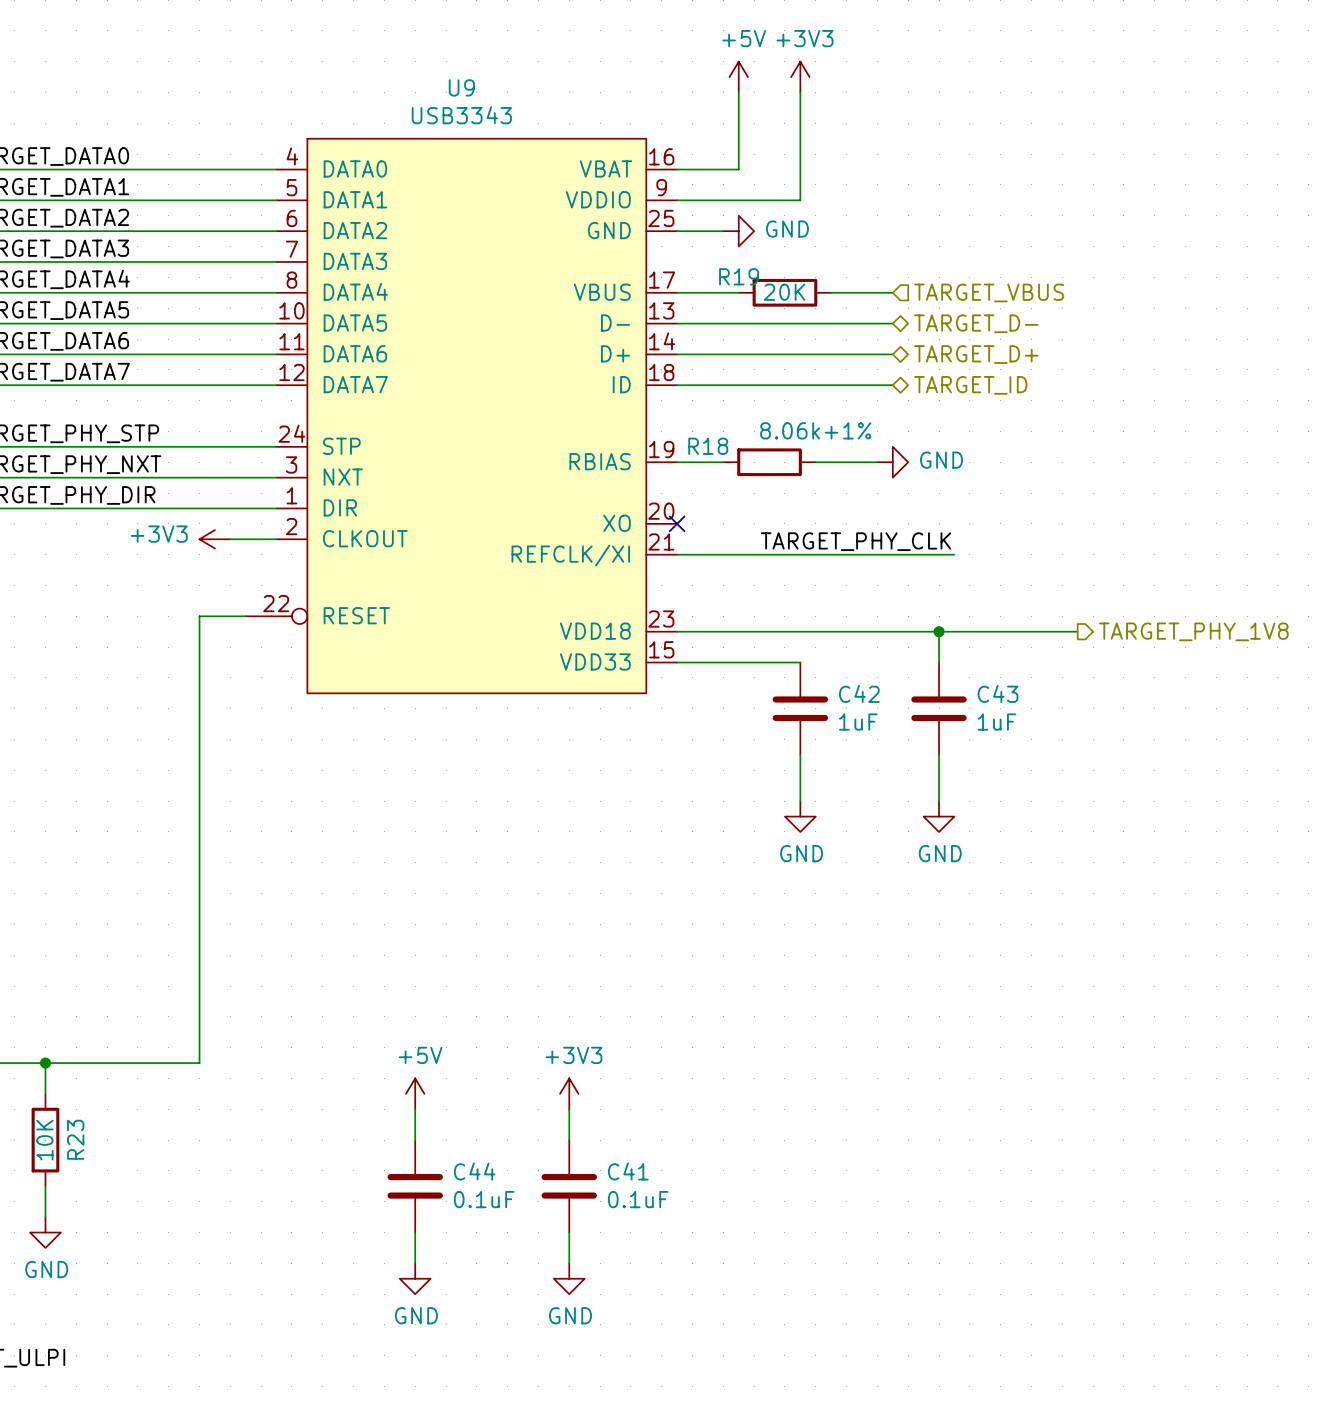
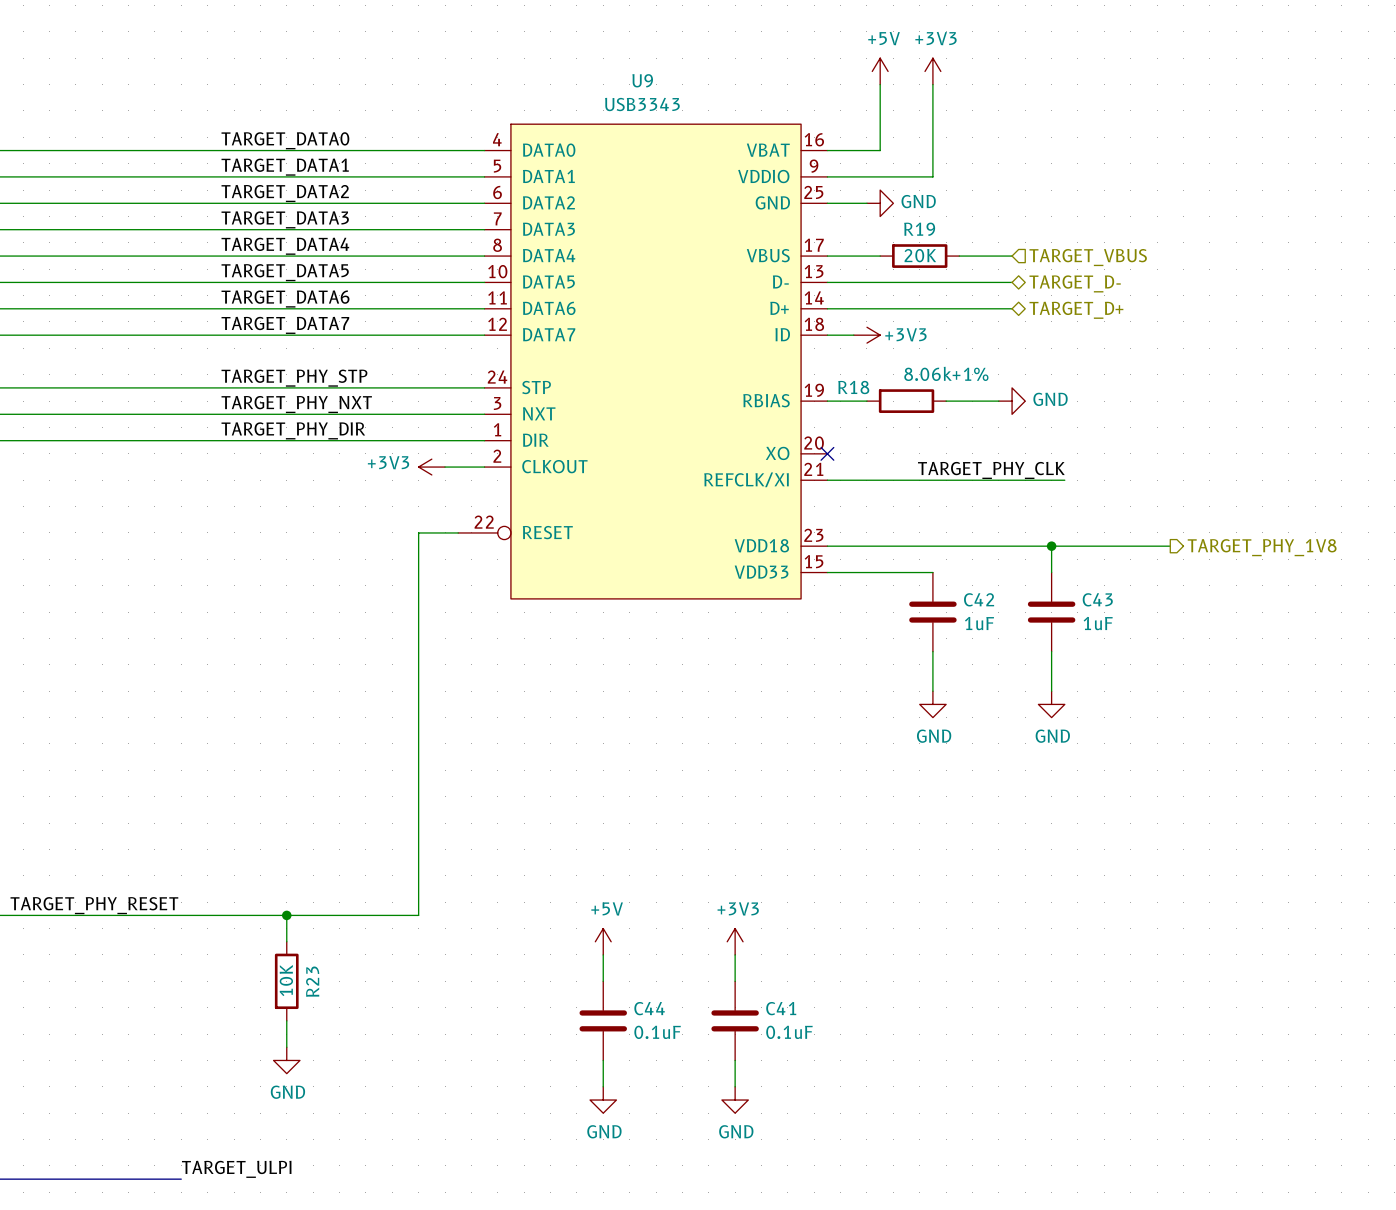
R19 name position: R19 (739, 276) -> R19 (919, 229)
wire: (707, 385) (892, 385) -> none
power symbol: none -> +3V3 (866, 335)
hierarchical label: TARGET_ID (970, 385) -> none

